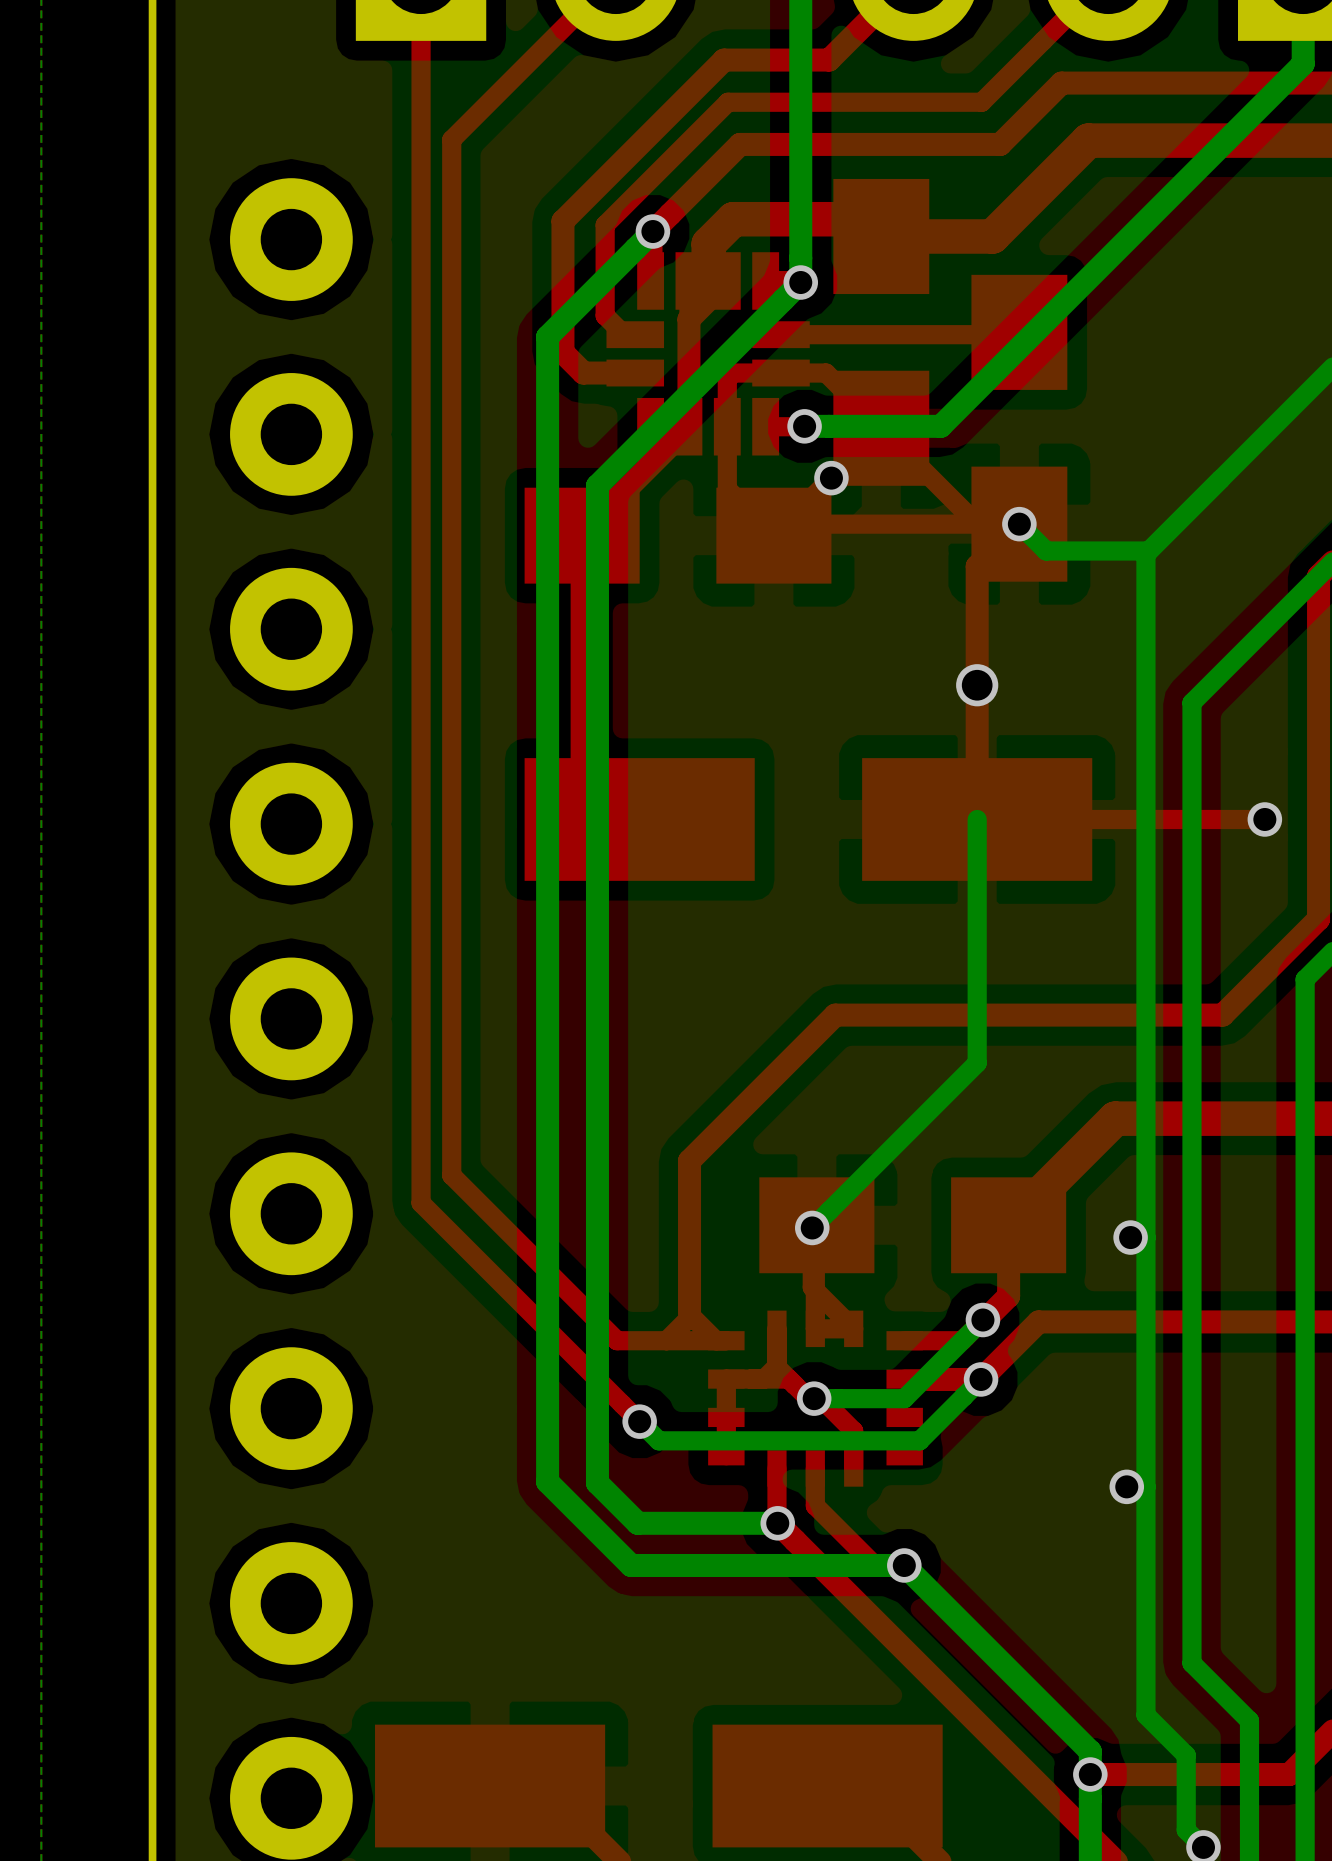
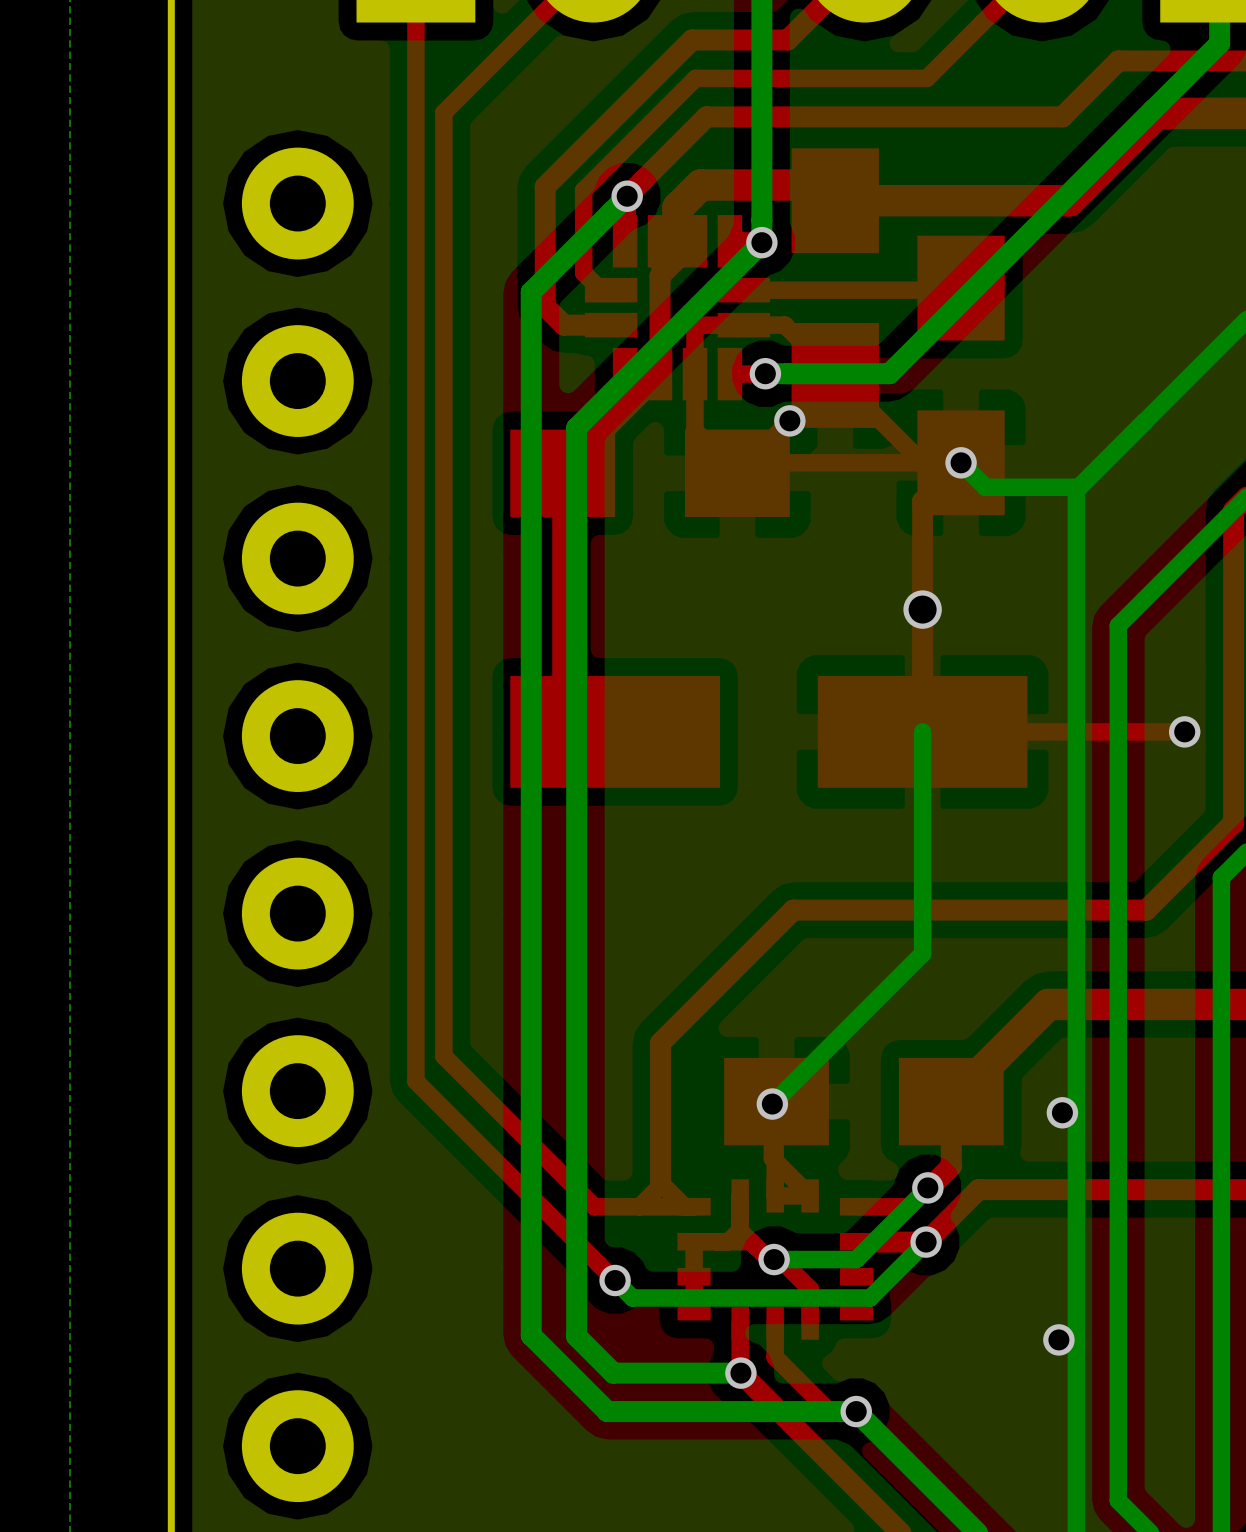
top track: (1191, 83) (1061, 83) (1000, 144) -> (1118, 60) (1062, 116) (943, 116)
top track: (1234, 140) (1088, 140) (992, 236) -> (1156, 113) (1069, 200) (936, 200)

